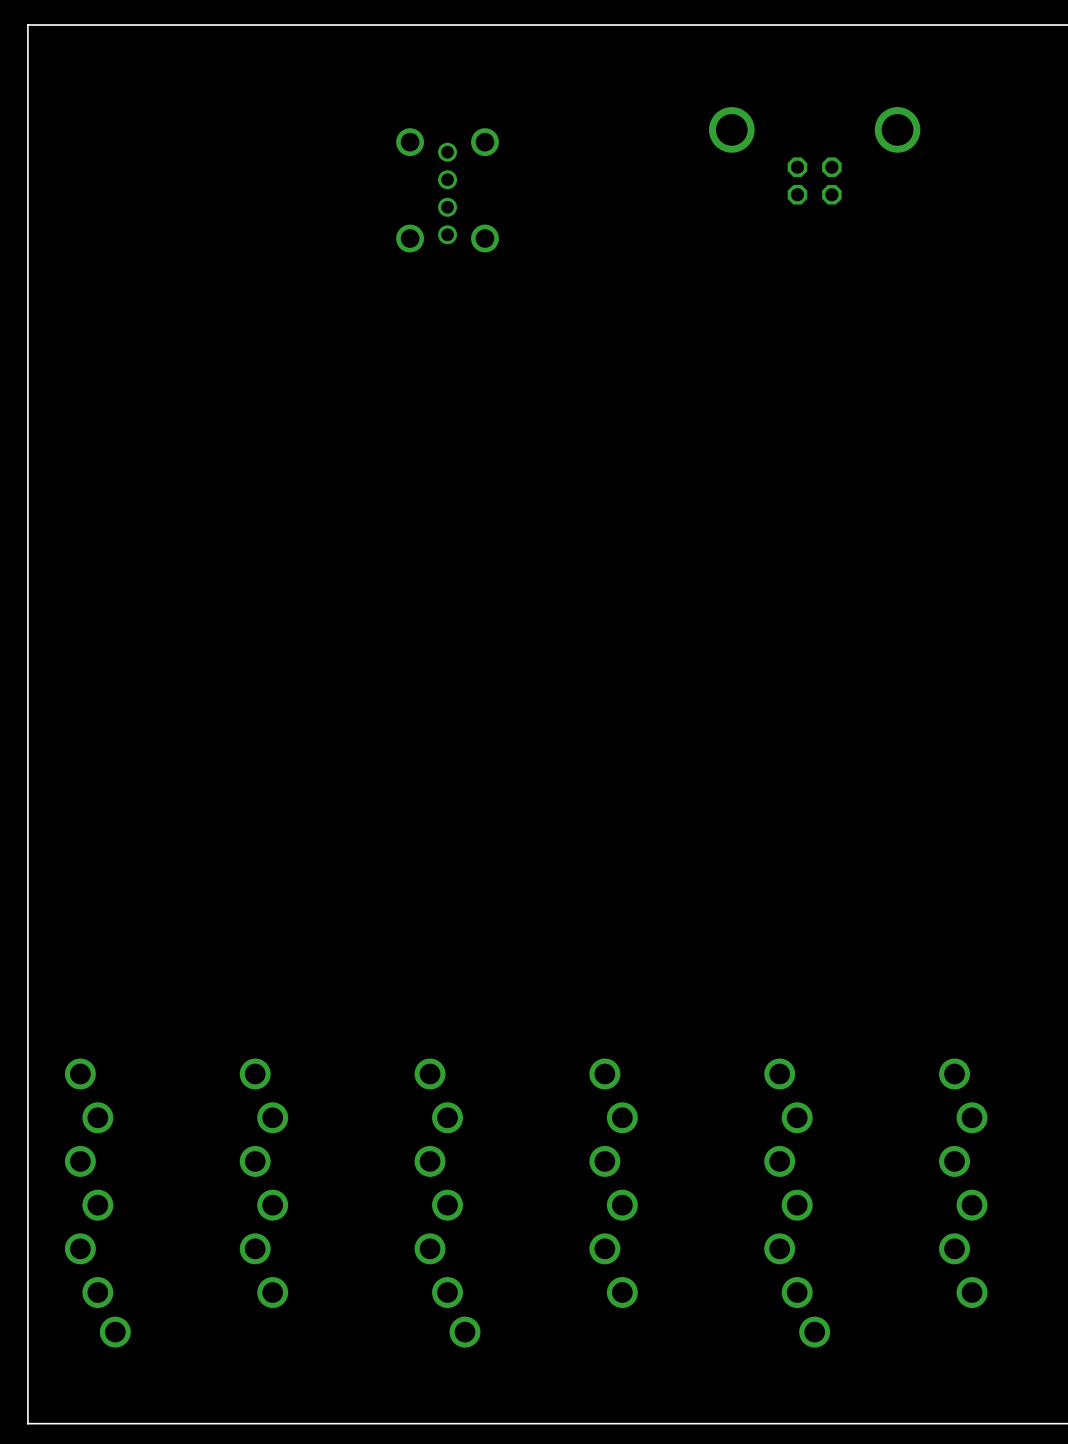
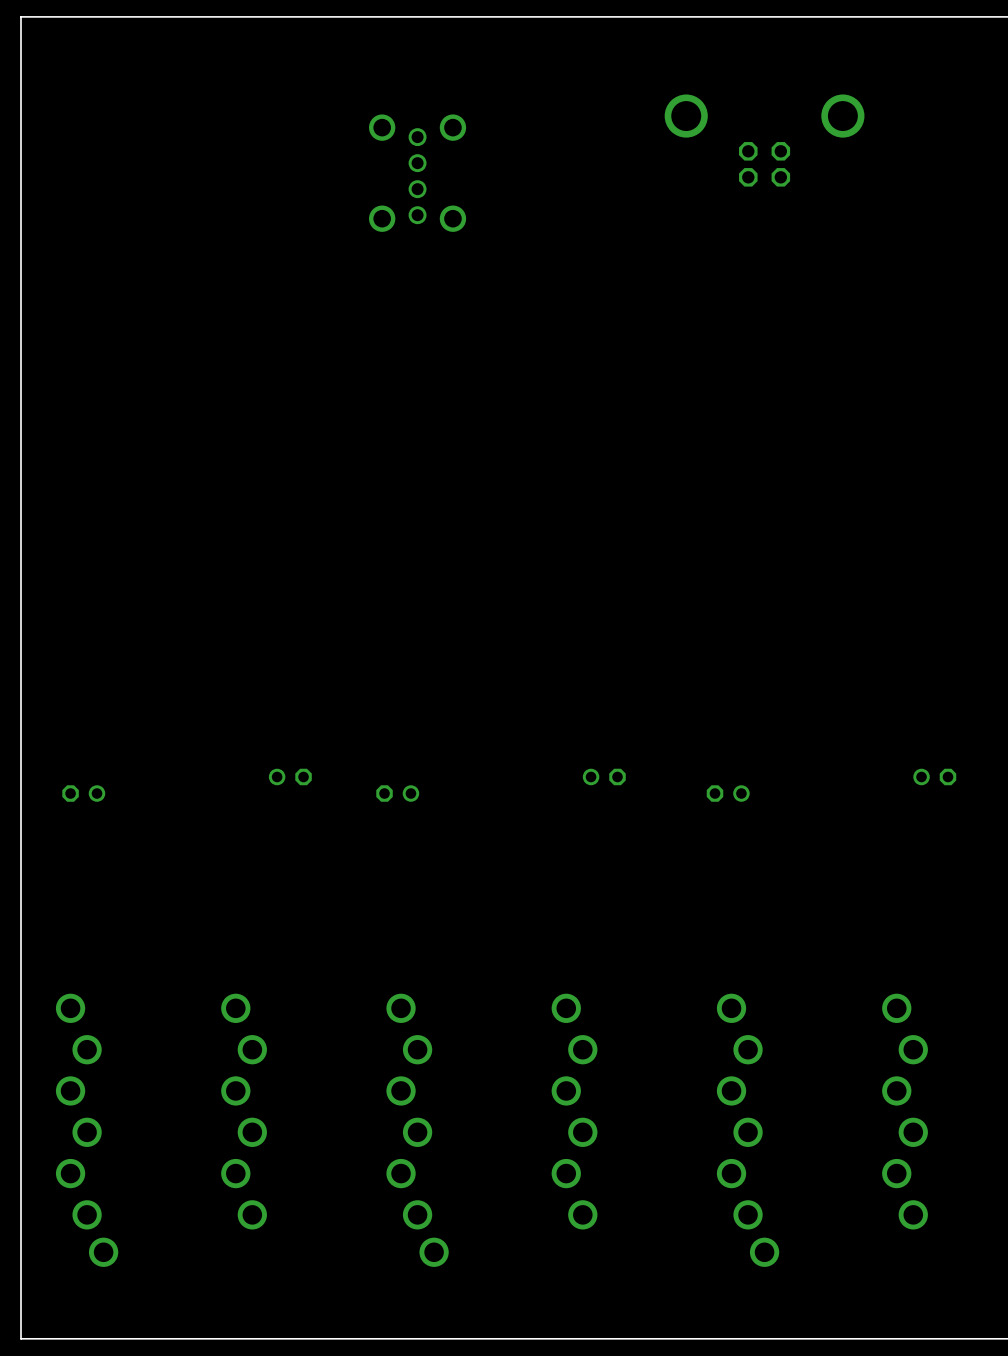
part: none -> (290, 776)
part: none -> (604, 776)
part: none -> (934, 776)
part: none -> (83, 793)
part: none -> (397, 793)
part: none -> (728, 793)

